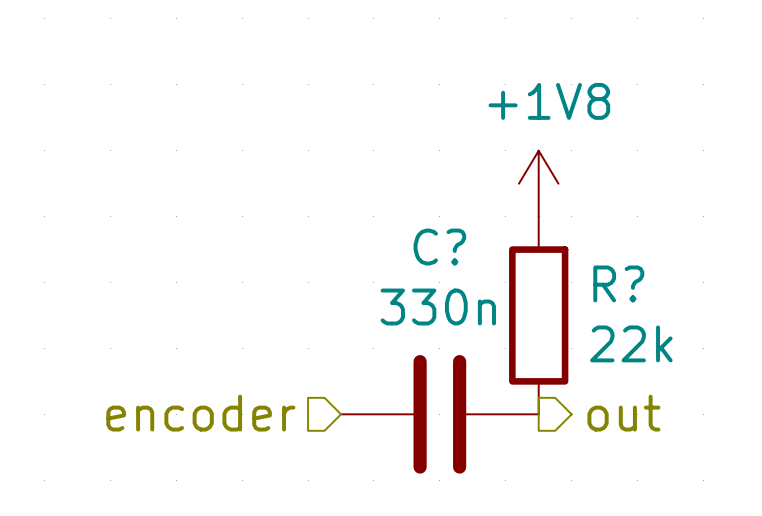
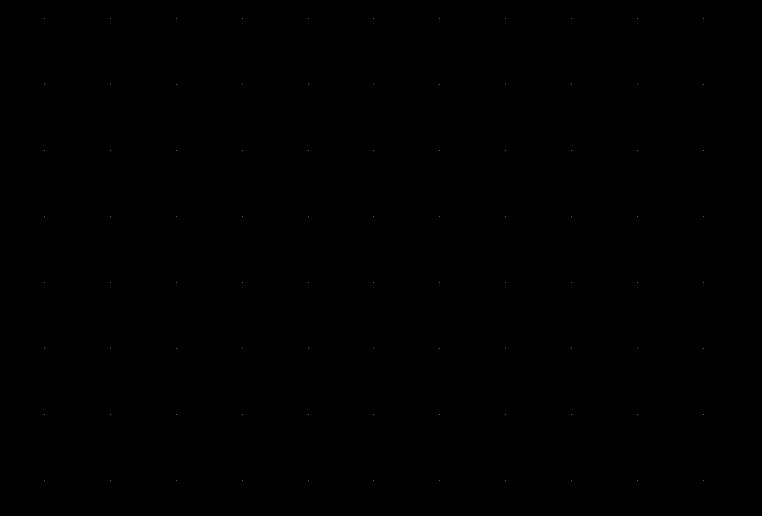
power symbol: +1V8 (538, 183) -> none
R?: 22k (538, 315) -> none
hierarchical label: encoder (200, 413) -> none
hierarchical label: out (623, 413) -> none
C?: 330n (439, 414) -> none

